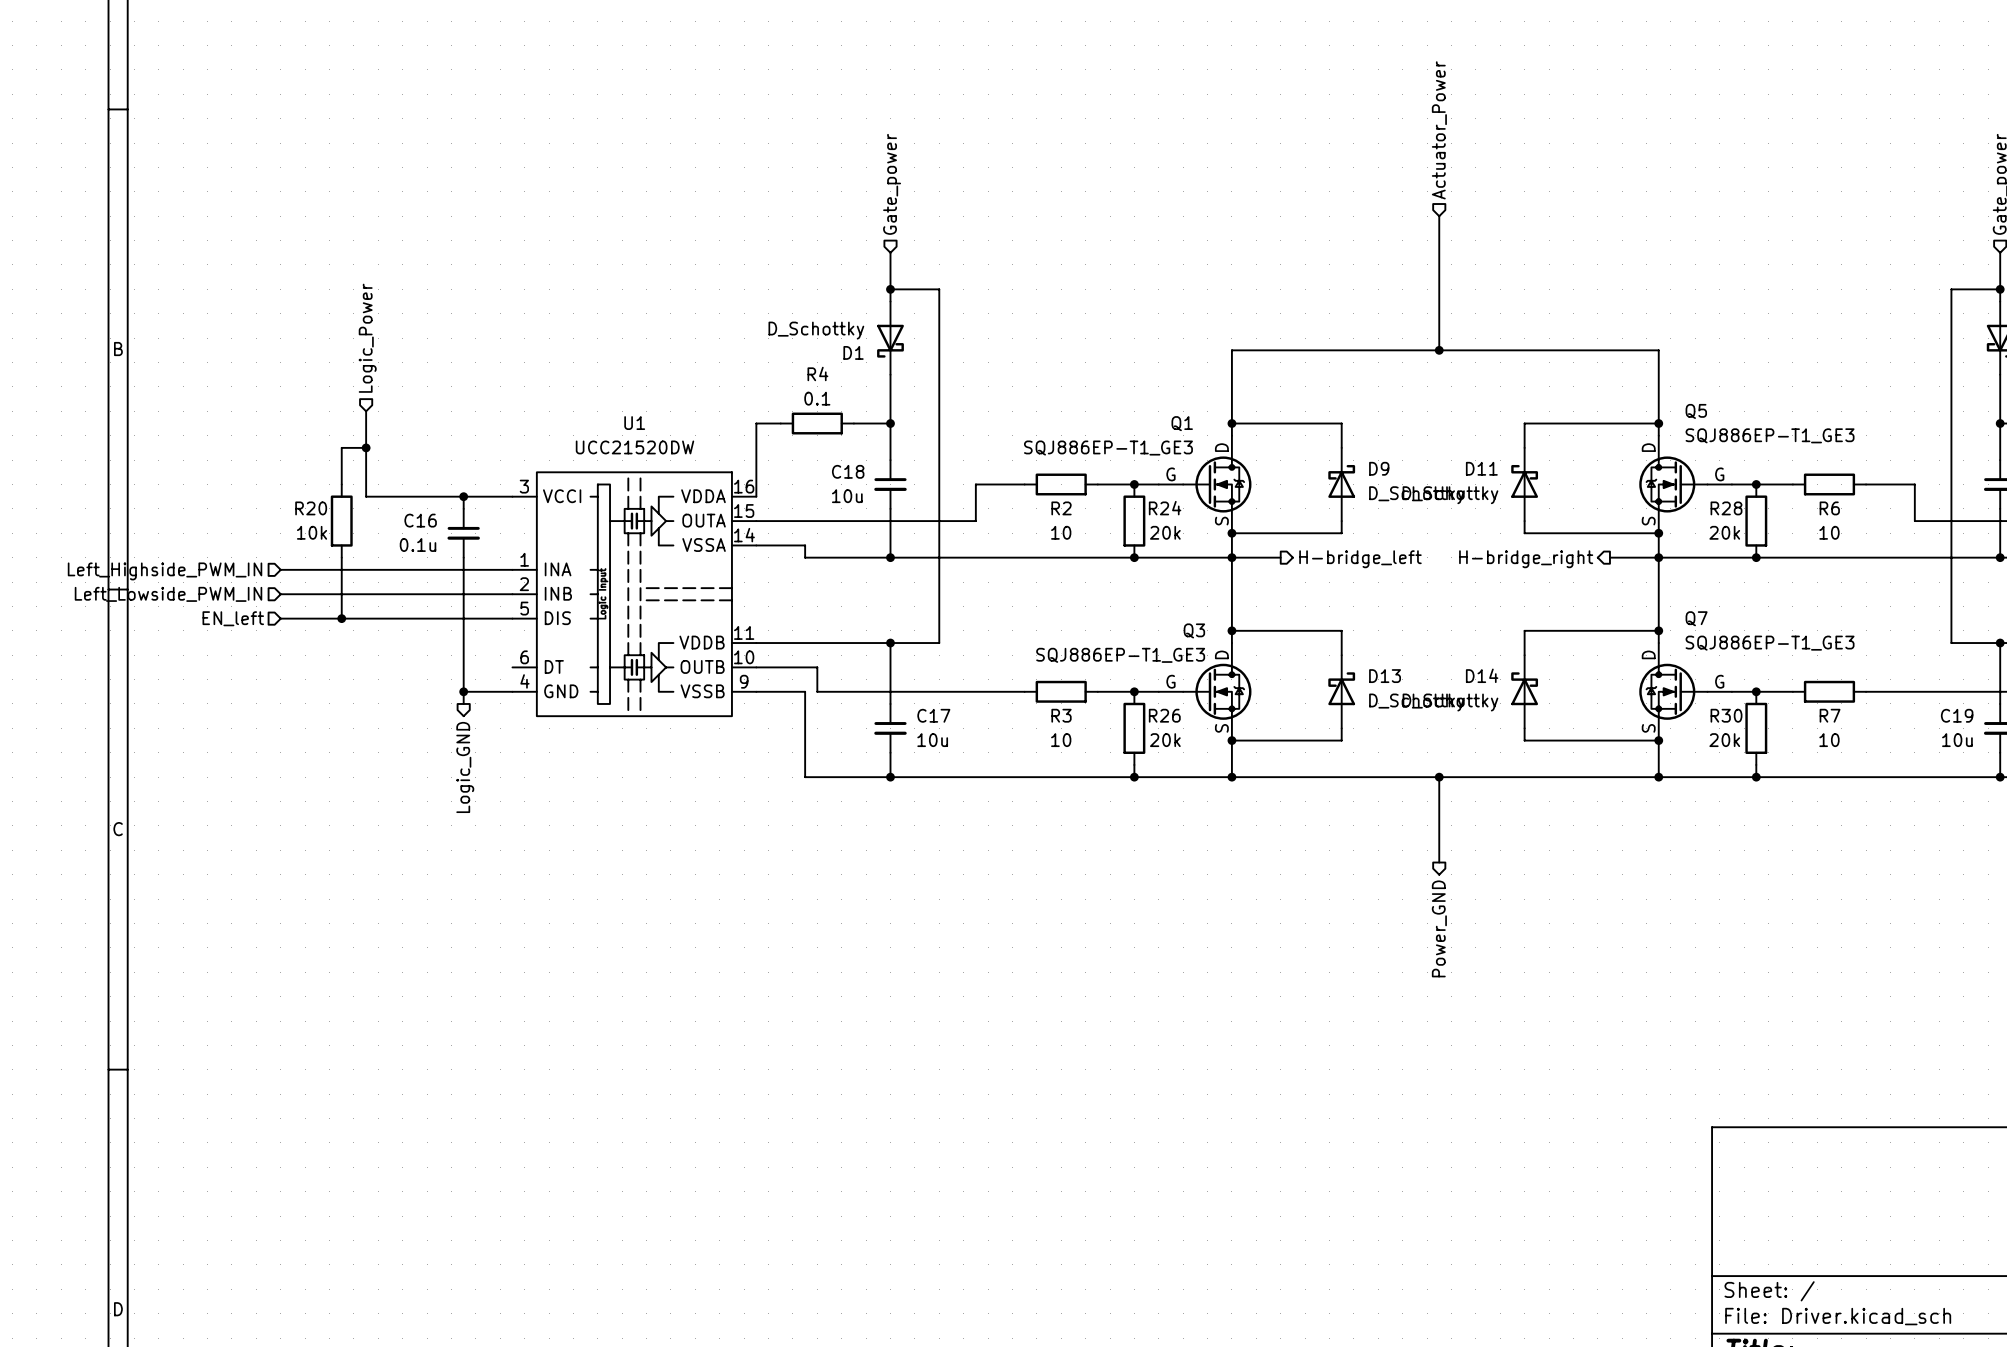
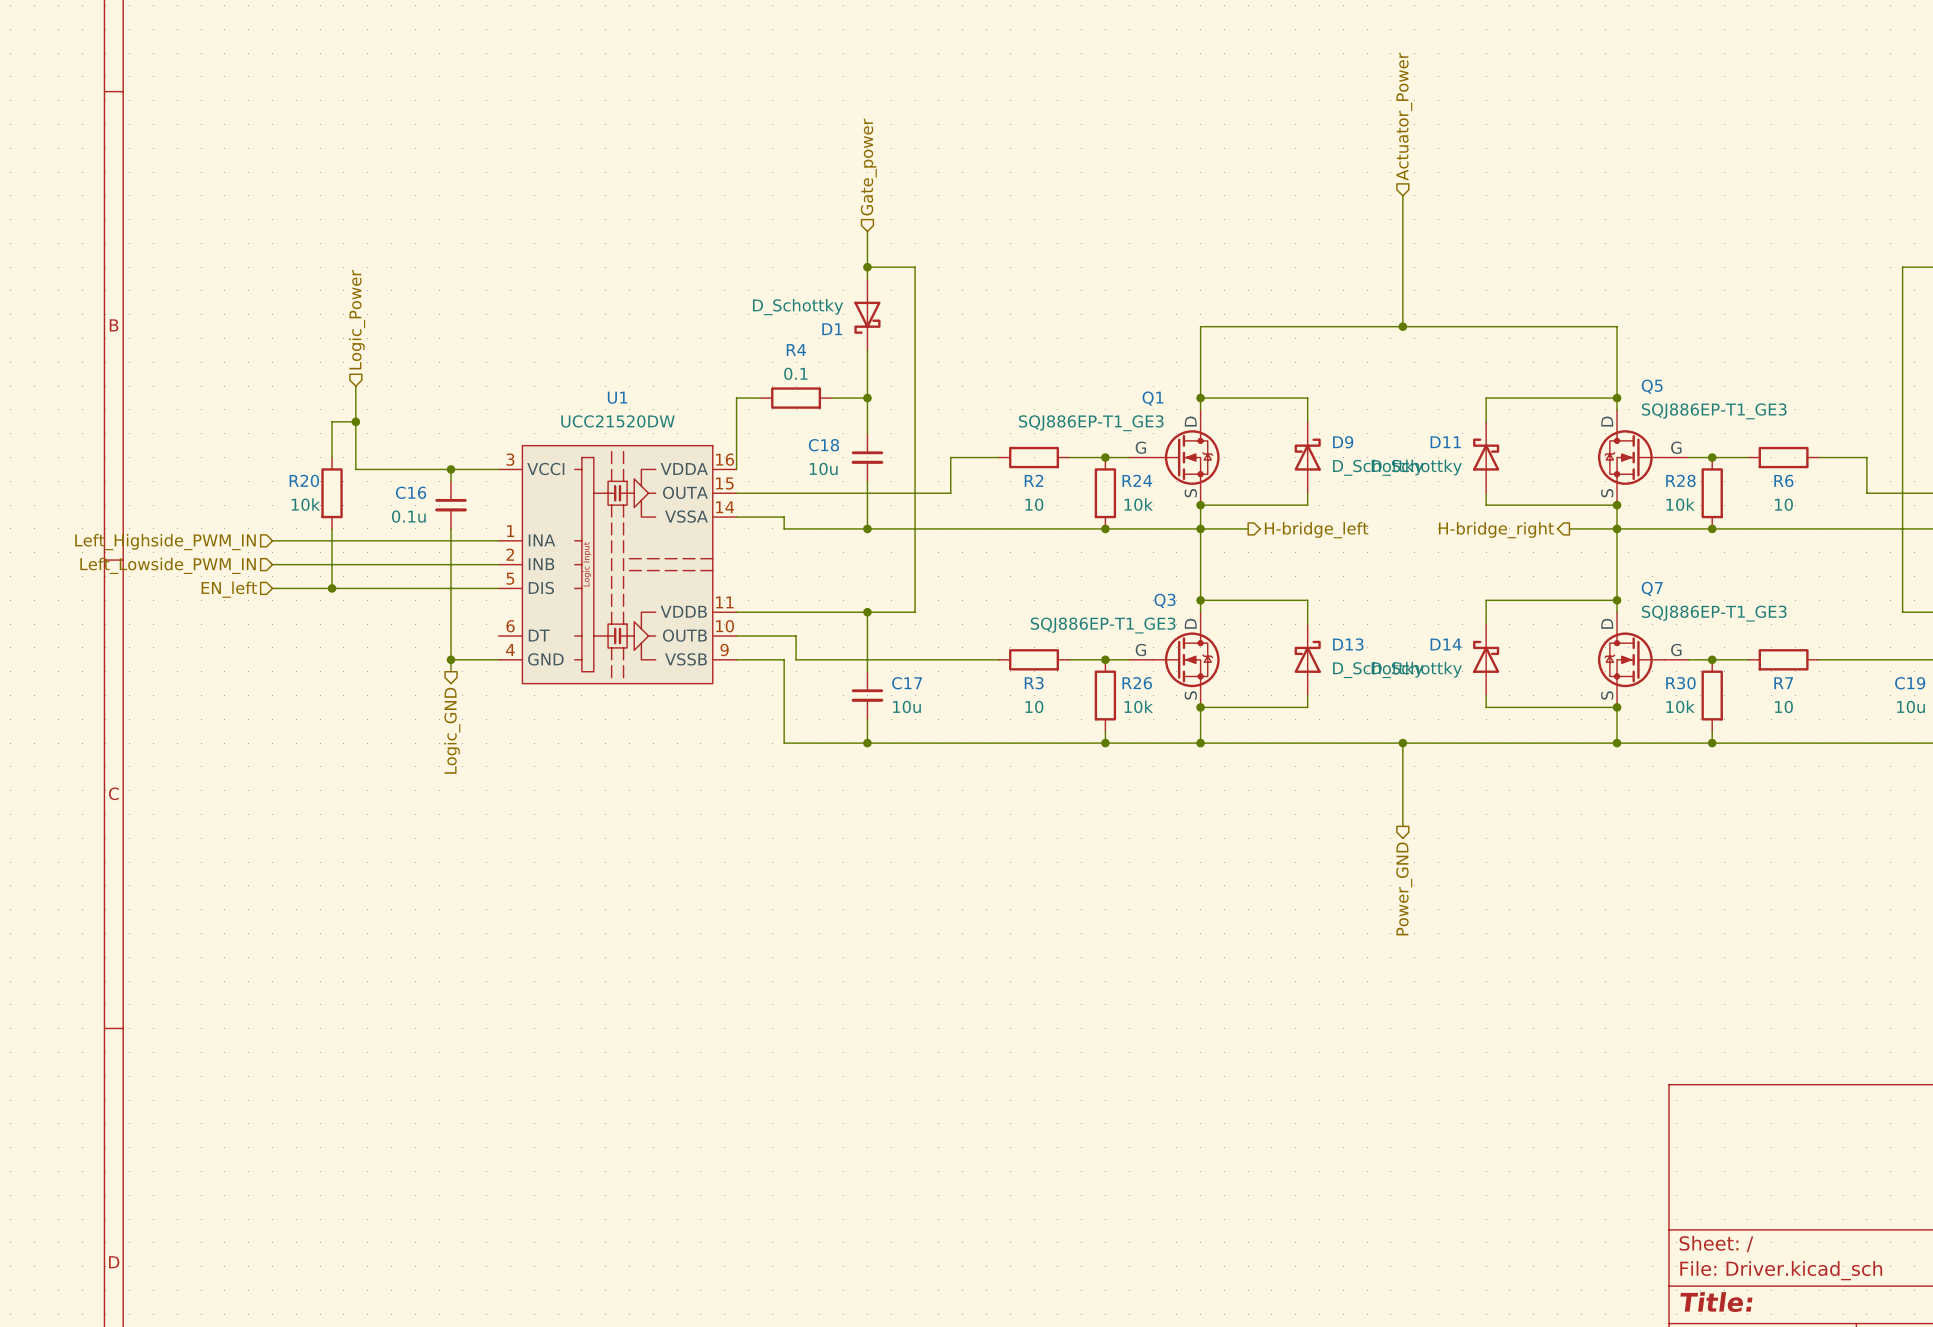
R24 value: 20k (1165, 532) -> 10k (1138, 504)
R28 value: 20k (1724, 532) -> 10k (1680, 504)
R26 value: 20k (1165, 740) -> 10k (1138, 706)
R30 value: 20k (1724, 740) -> 10k (1680, 706)

